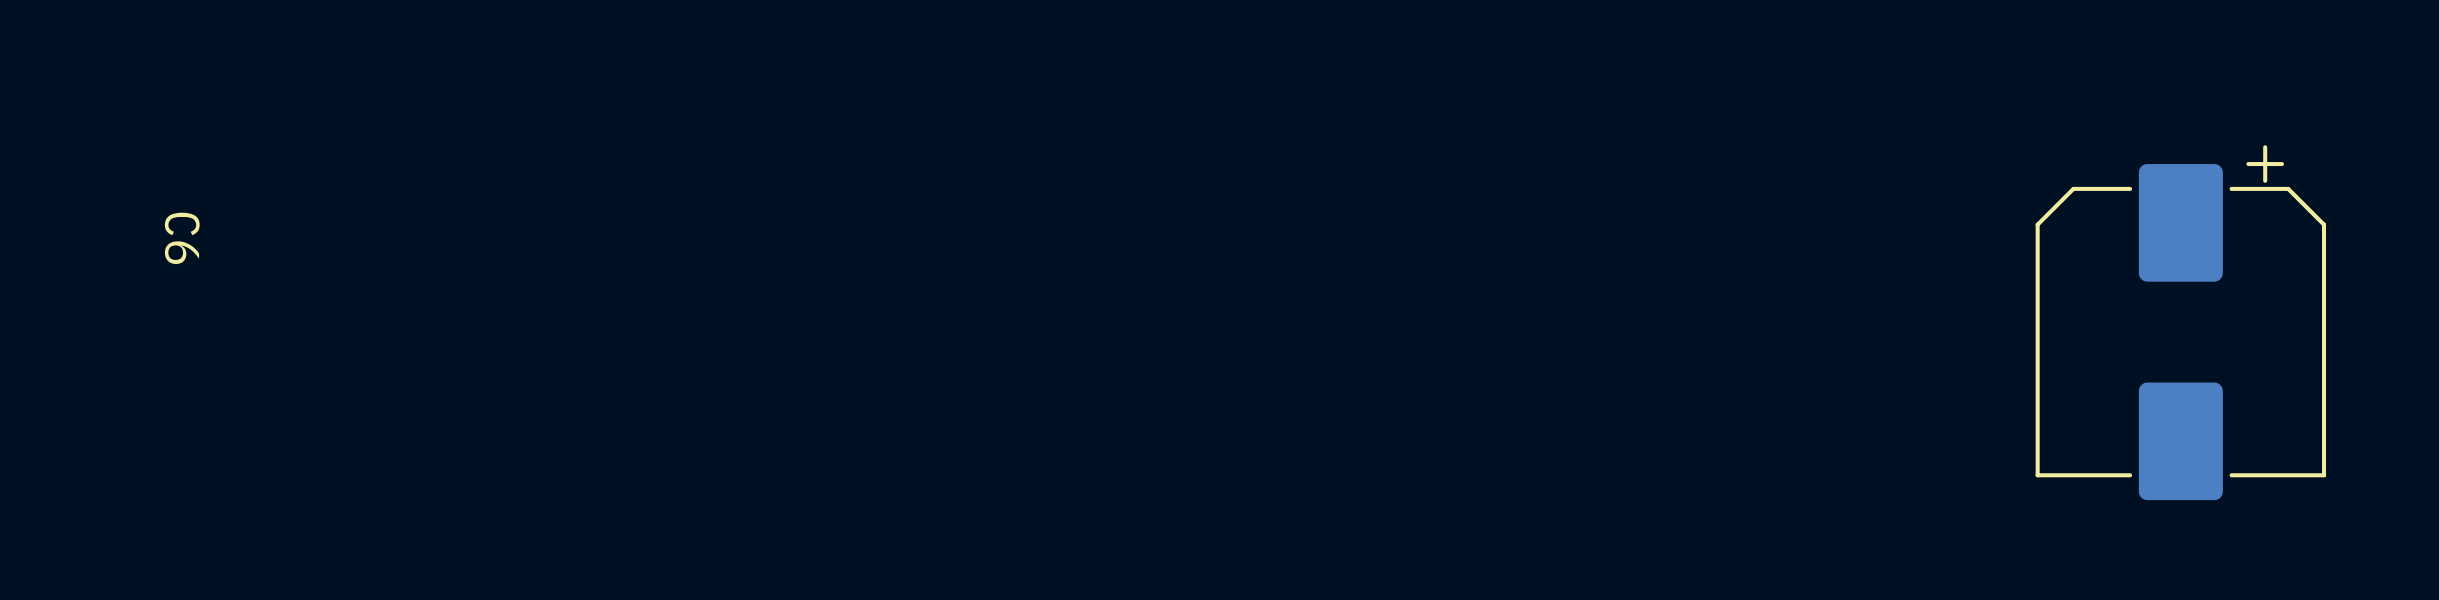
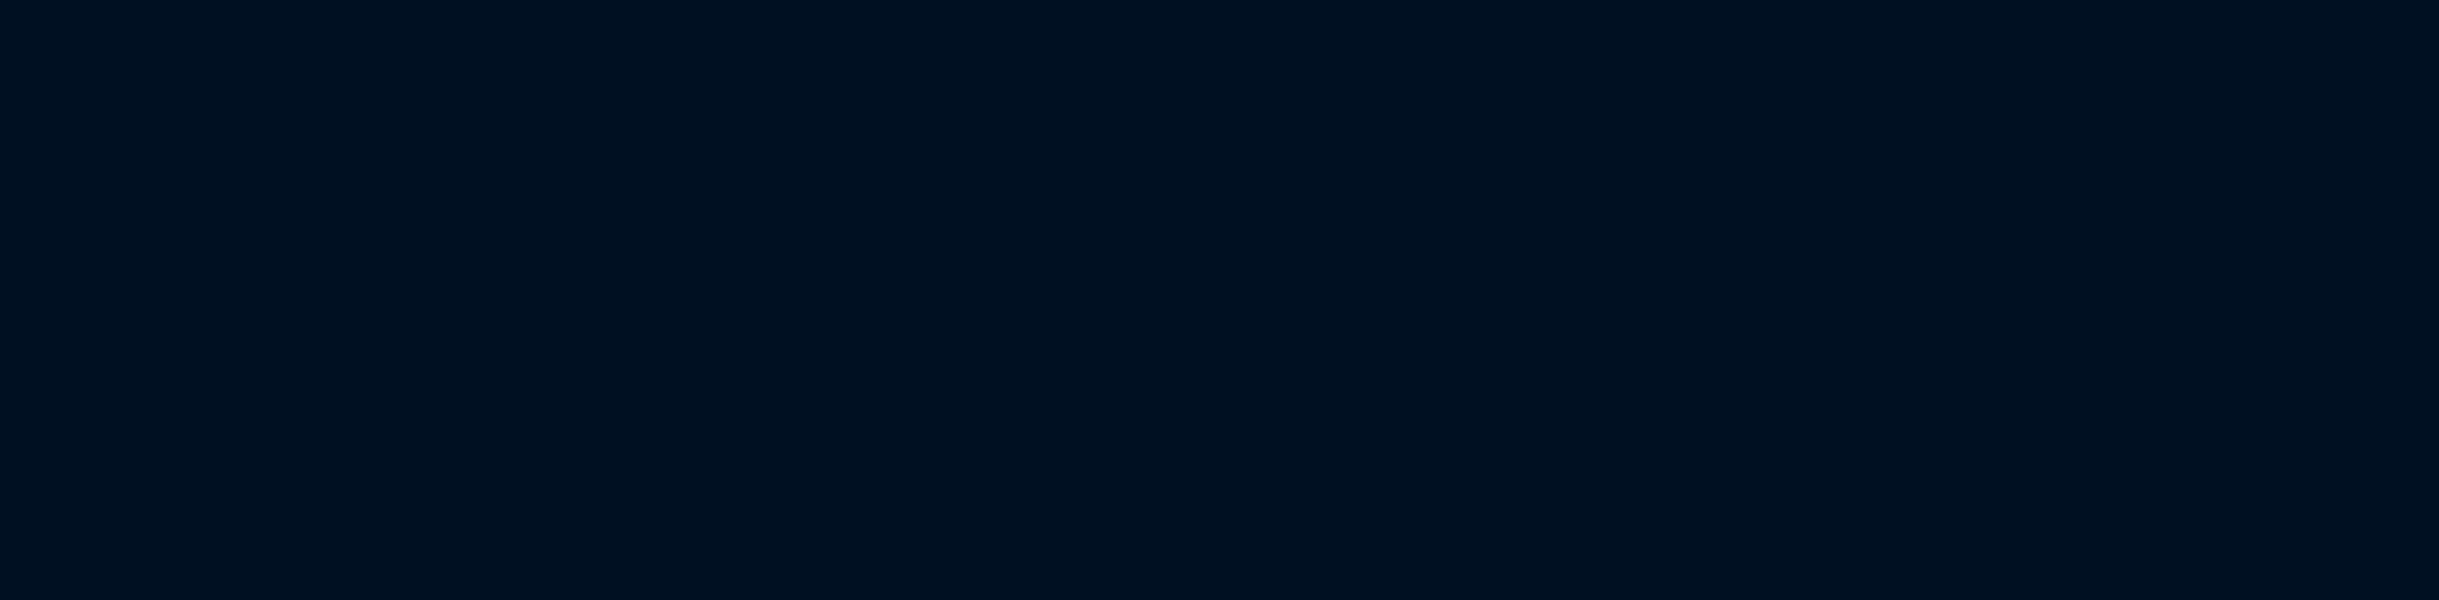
C6: (2180, 322) -> none

